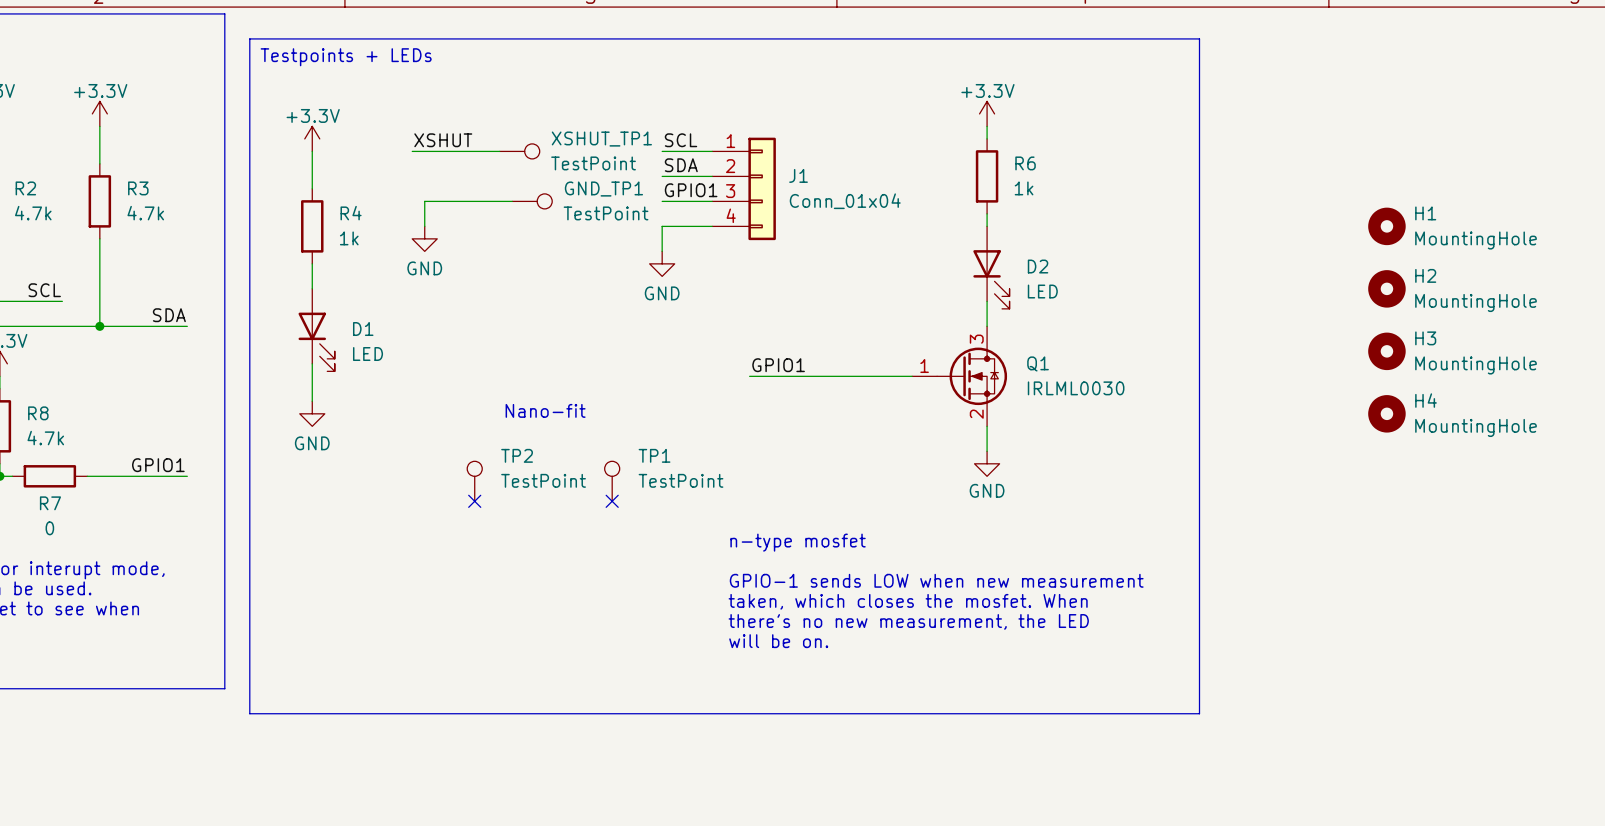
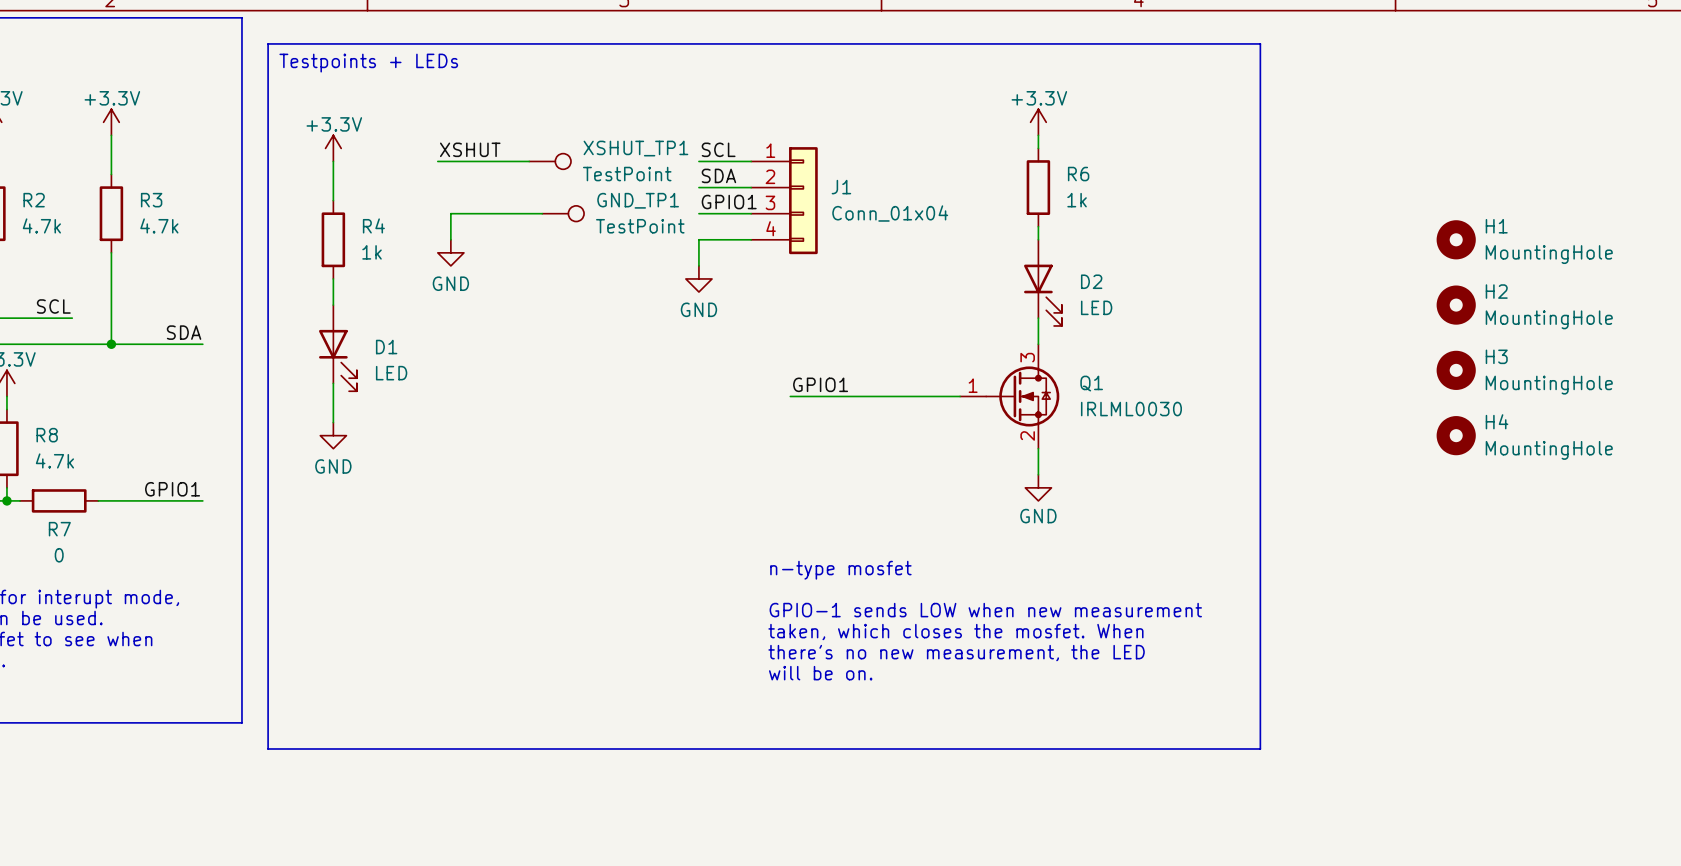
text: Nano-fit (545, 410) -> none
TP2: TestPoint (474, 481) -> none
TP1: TestPoint (612, 481) -> none
no-connect mark: (474, 501) -> none
no-connect mark: (612, 501) -> none

